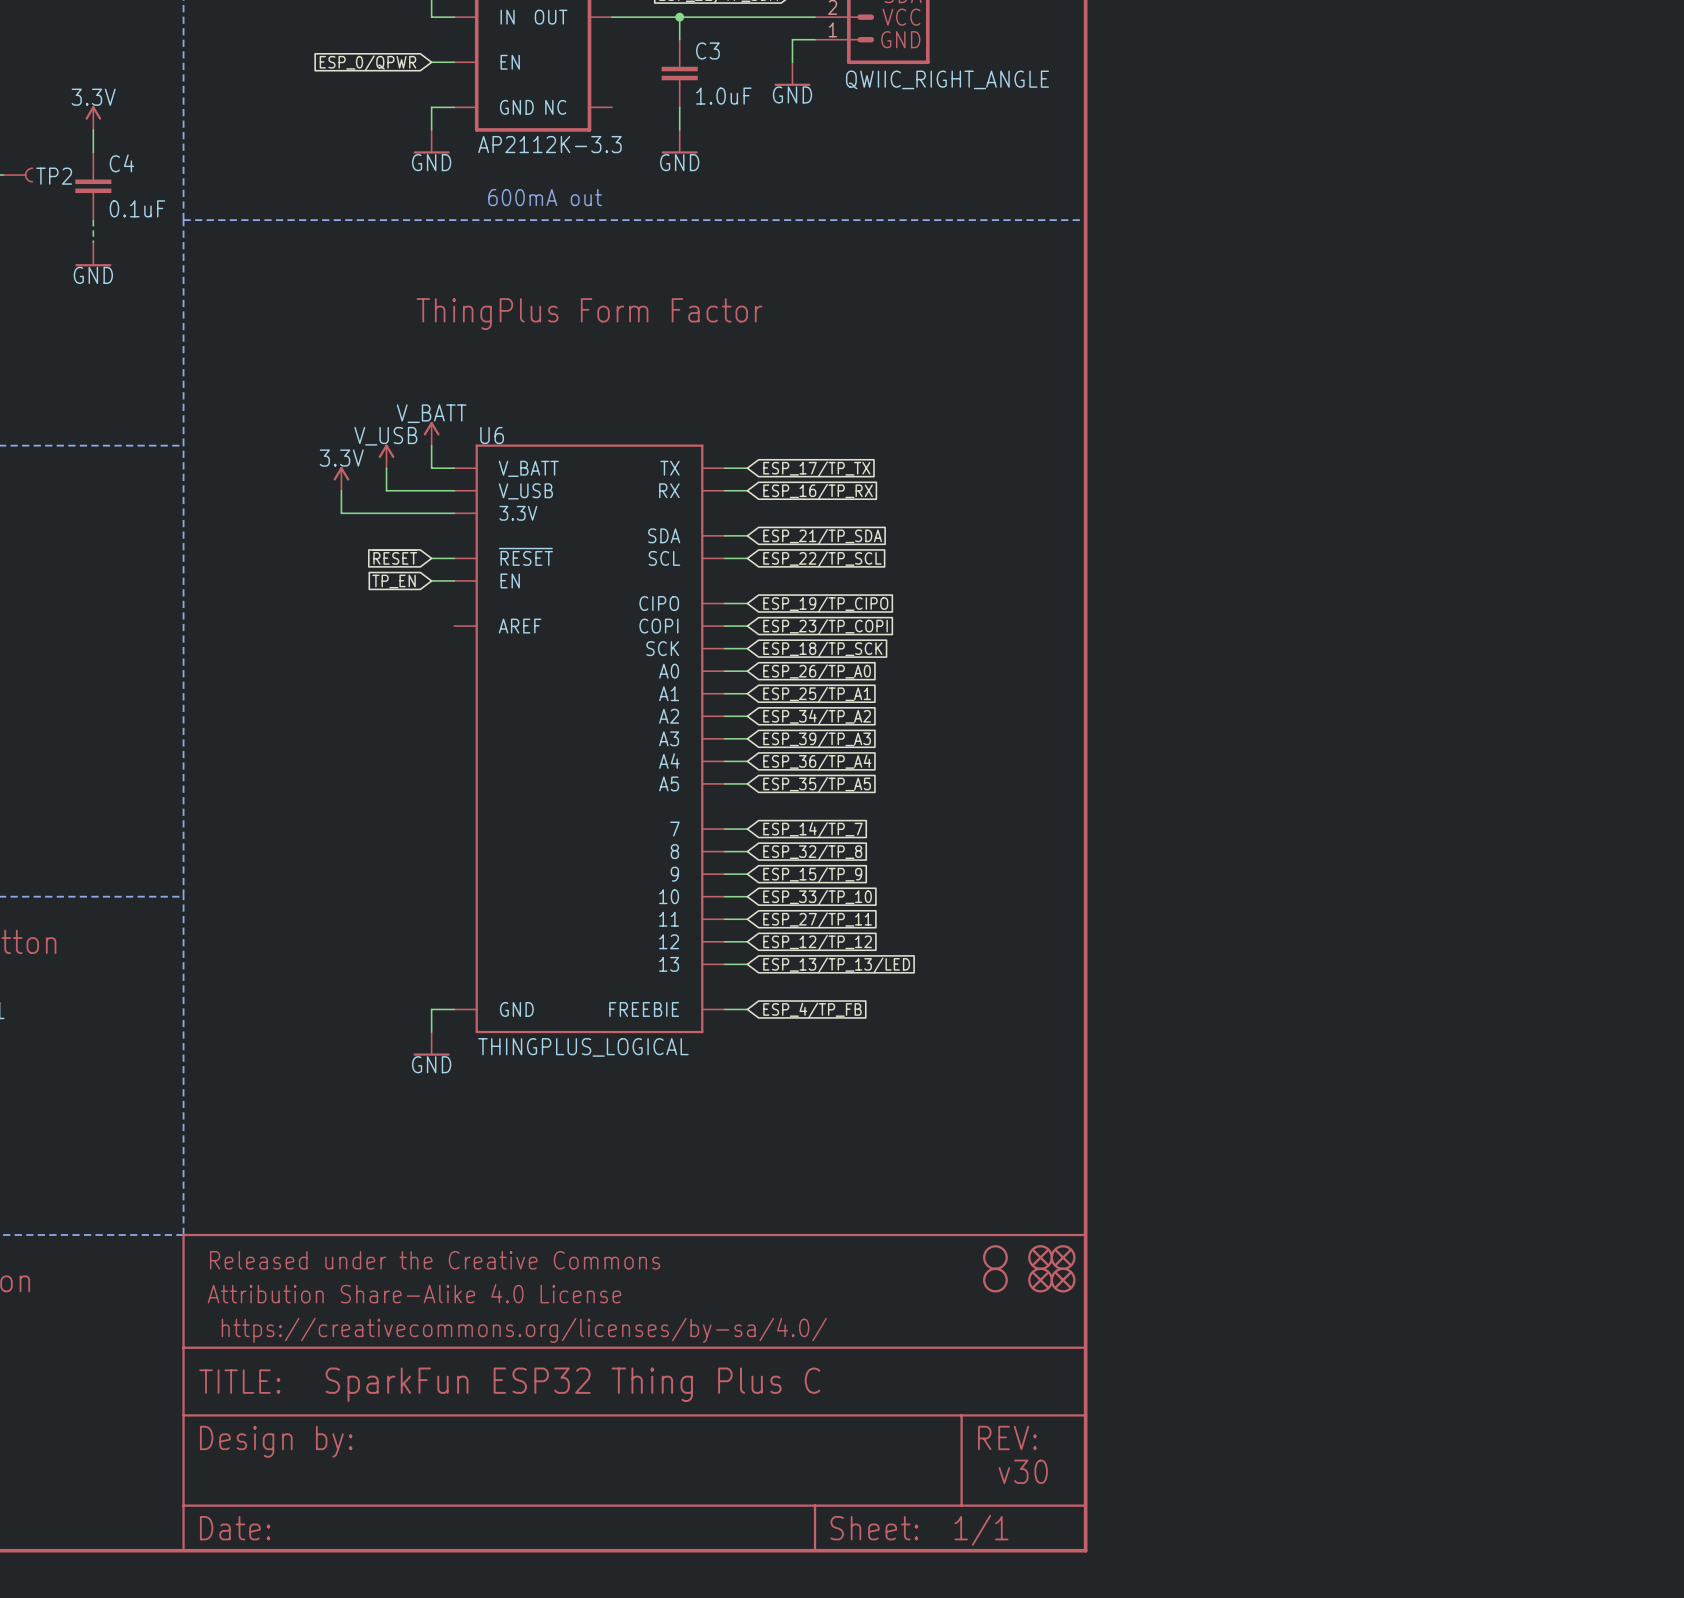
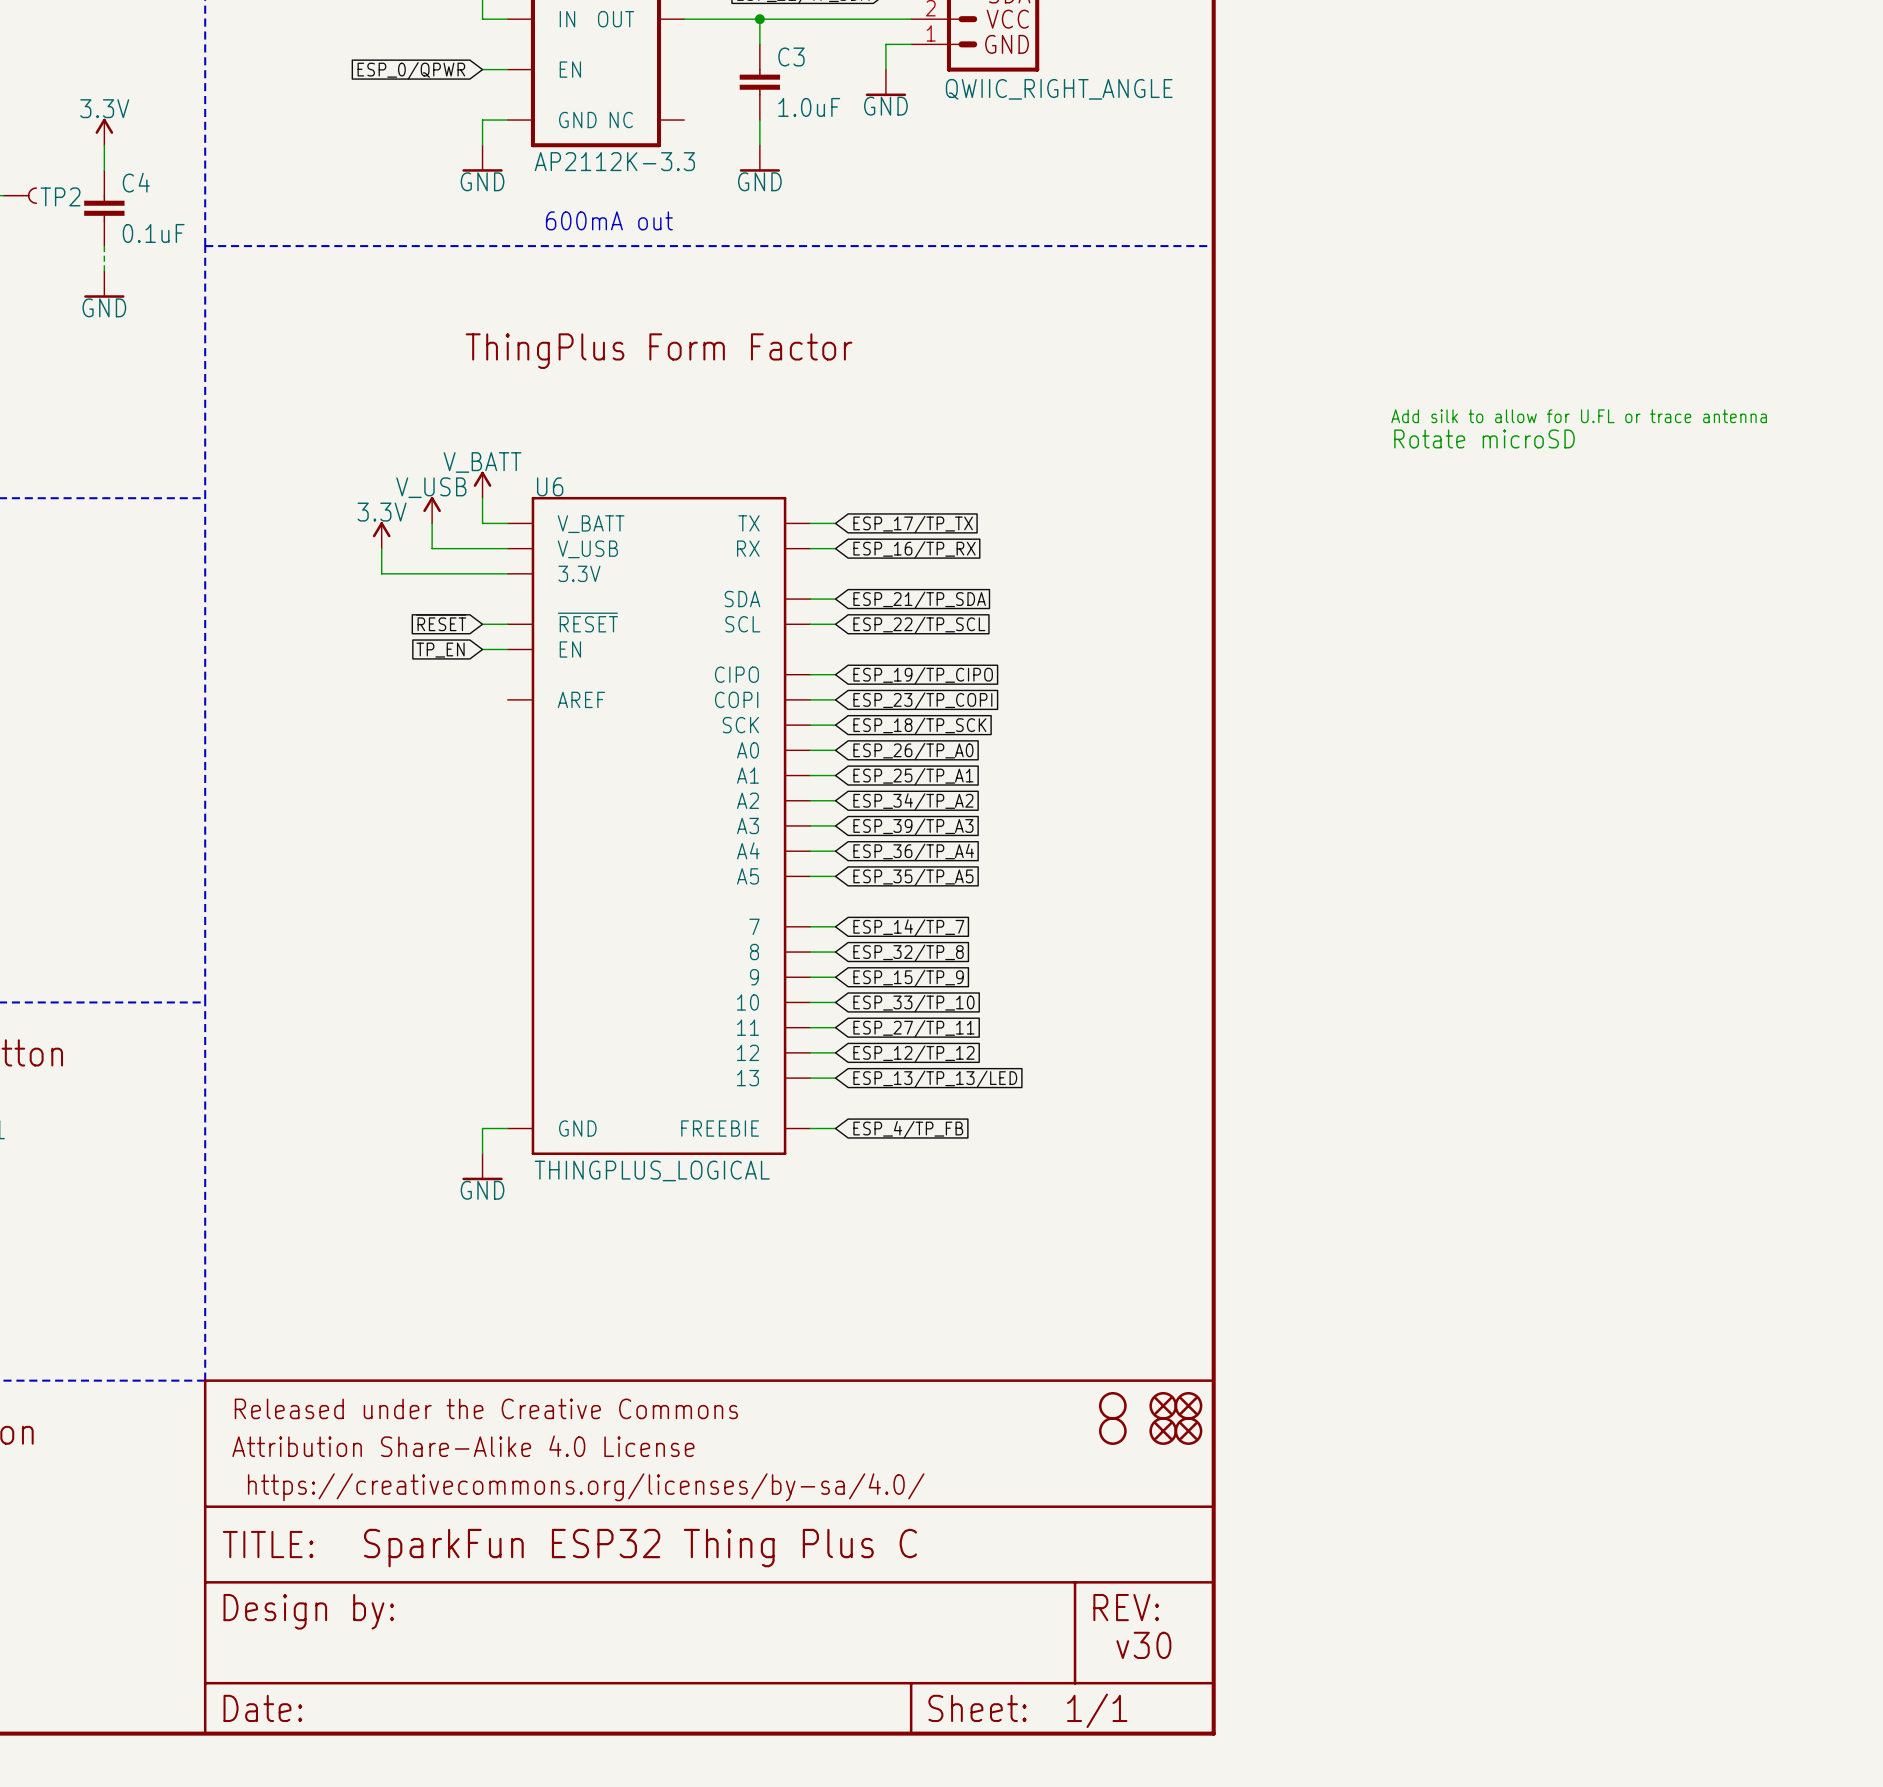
text: none -> Add silk to allow for U.FL or trace antenna (1579, 416)
text: none -> Rotate microSD (1484, 438)

